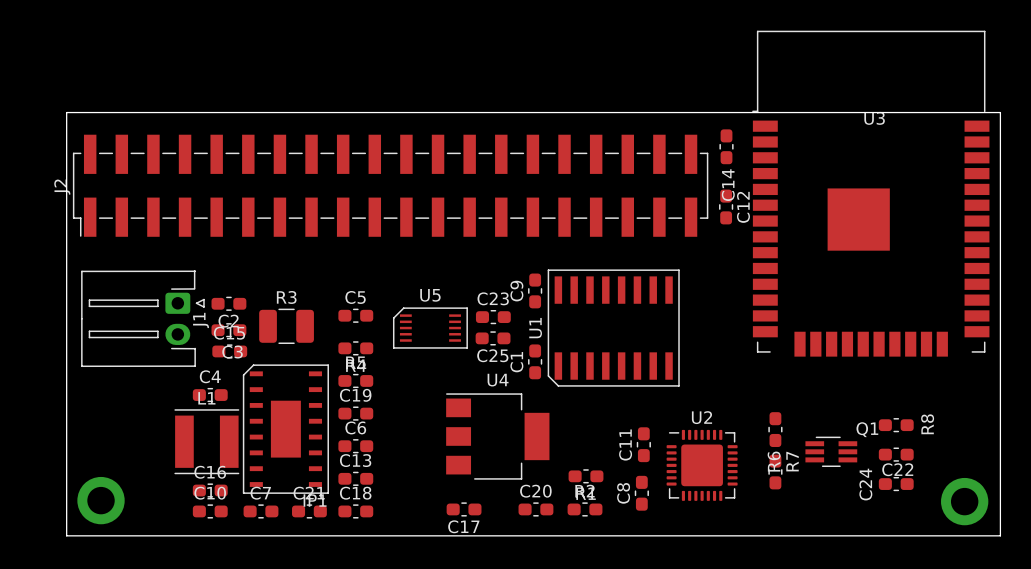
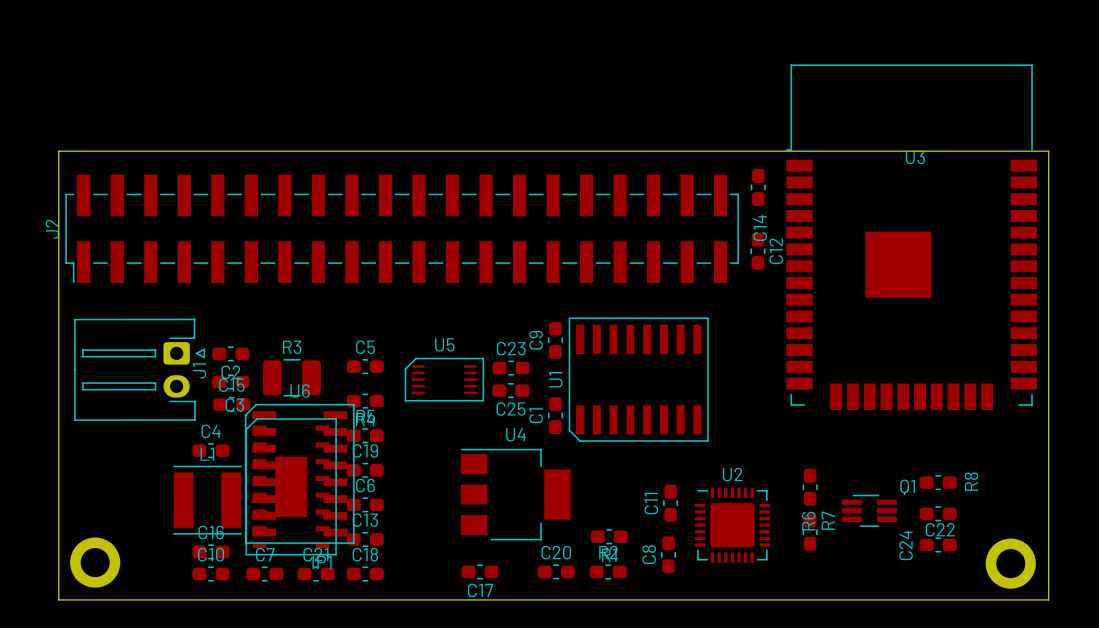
U6: none -> (299, 473)

